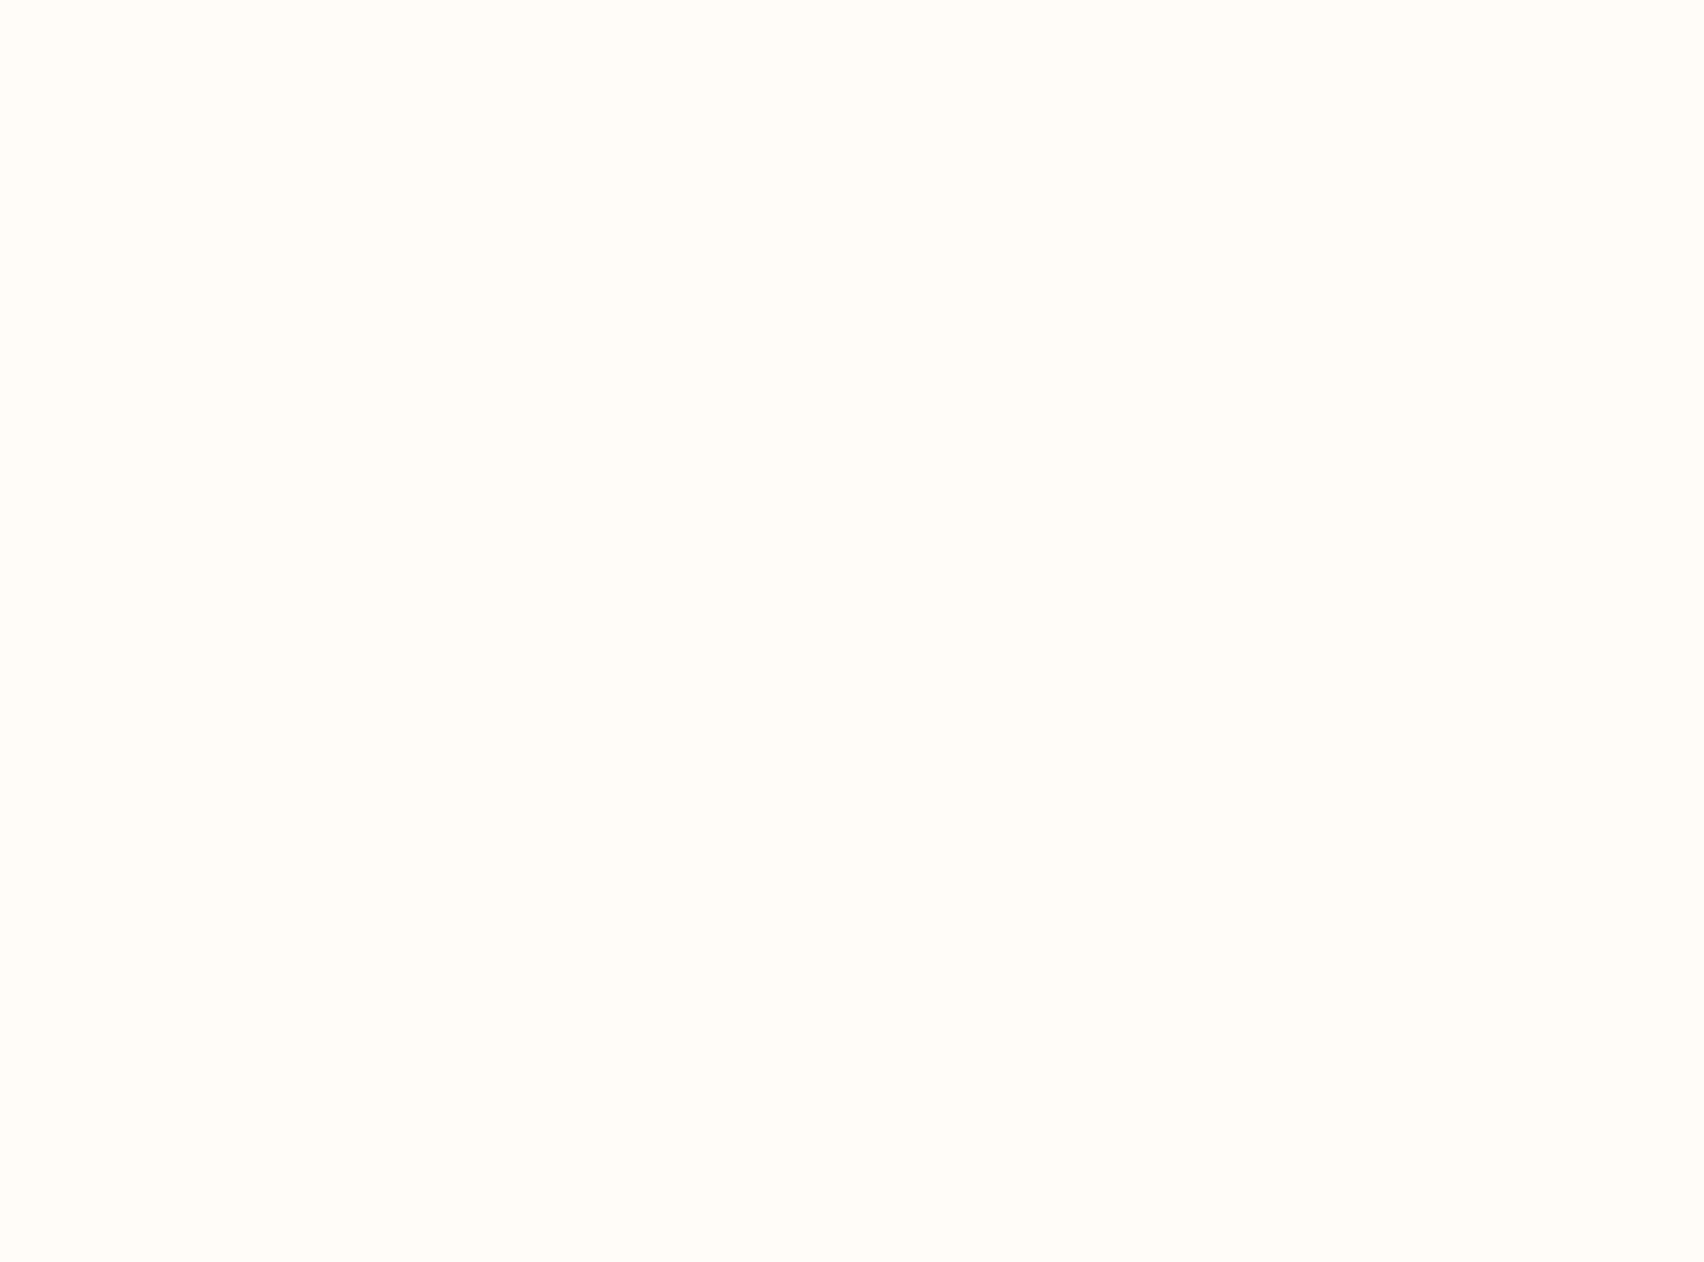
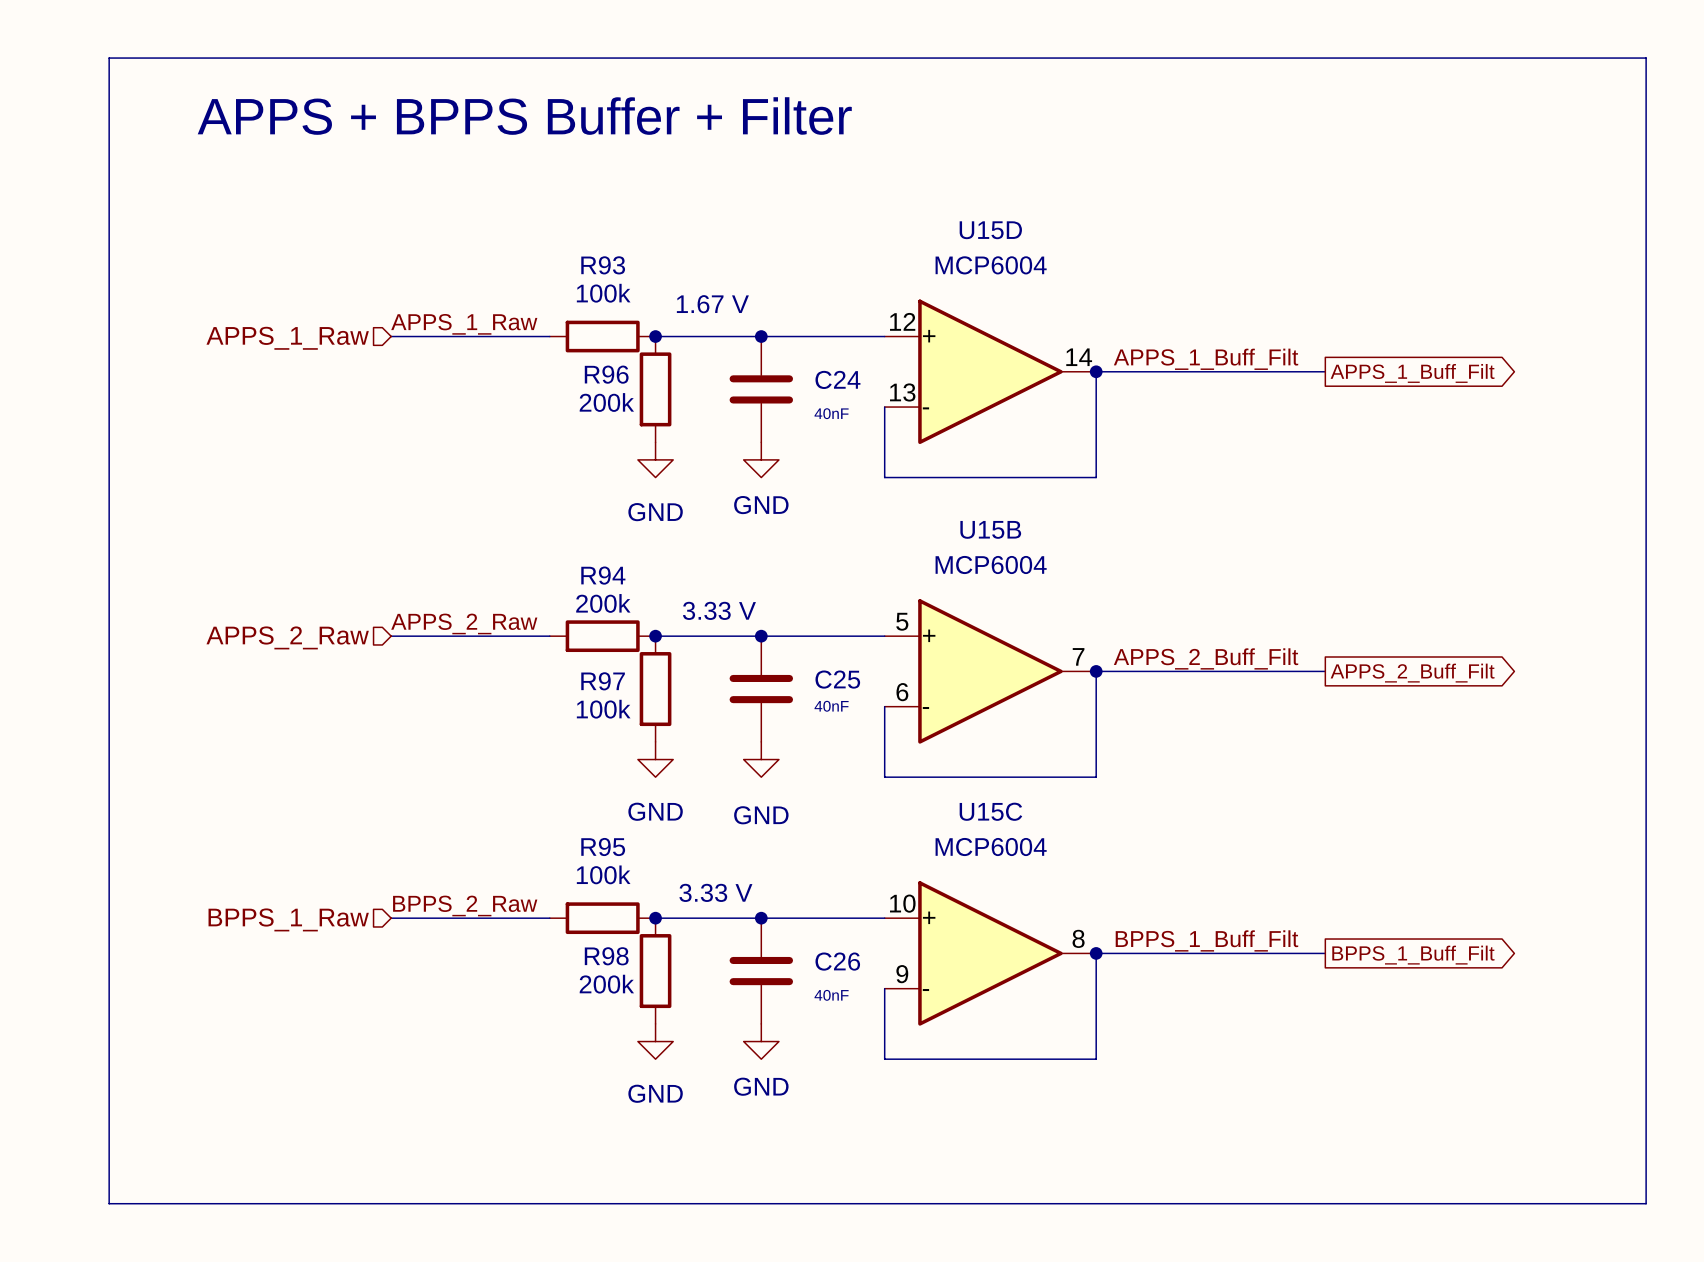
line: none -> (109, 58) (1646, 58) (1646, 1203) (109, 1203) (109, 58)
text: none -> APPS + BPPS Buffer + Filter (524, 116)
text: none -> 1.67 V (712, 304)
label: none -> APPS_1_Raw (464, 324)
wire: none -> (391, 336) (549, 336)
R93: none -> 100k (602, 336)
wire: none -> (655, 336) (884, 336)
junction: none -> (655, 336)
junction: none -> (761, 336)
hierarchical label: none -> APPS_1_Raw (287, 338)
label: none -> APPS_1_Buff_Filt (1206, 359)
U15D: none -> MCP6004 (990, 371)
junction: none -> (1096, 371)
wire: none -> (1325, 371) (1096, 371) (1096, 477) (884, 477) (884, 407)
global label: none -> APPS_1_Buff_Filt (1412, 373)
R96: none -> 200k (655, 389)
C24: none -> 40nF (761, 389)
power symbol: none -> GND (655, 459)
power symbol: none -> GND (761, 459)
text: none -> 3.33 V (719, 610)
label: none -> APPS_2_Raw (464, 623)
wire: none -> (391, 636) (549, 636)
R94: none -> 200k (602, 636)
wire: none -> (655, 636) (884, 636)
junction: none -> (655, 636)
junction: none -> (761, 636)
hierarchical label: none -> APPS_2_Raw (287, 637)
label: none -> APPS_2_Buff_Filt (1206, 658)
U15B: none -> MCP6004 (990, 671)
junction: none -> (1096, 671)
wire: none -> (1325, 671) (1096, 671) (1096, 777) (884, 777) (884, 706)
global label: none -> APPS_2_Buff_Filt (1412, 673)
R97: none -> 100k (655, 689)
C25: none -> 40nF (761, 689)
power symbol: none -> GND (655, 759)
power symbol: none -> GND (761, 759)
text: none -> 3.33 V (715, 892)
label: none -> BPPS_2_Raw (465, 905)
wire: none -> (391, 918) (549, 918)
R95: none -> 100k (602, 918)
wire: none -> (655, 918) (884, 918)
junction: none -> (655, 918)
junction: none -> (761, 918)
hierarchical label: none -> BPPS_1_Raw (288, 919)
label: none -> BPPS_1_Buff_Filt (1206, 940)
U15C: none -> MCP6004 (990, 953)
junction: none -> (1096, 953)
wire: none -> (1325, 953) (1096, 953) (1096, 1059) (884, 1059) (884, 988)
global label: none -> BPPS_1_Buff_Filt (1413, 955)
R98: none -> 200k (655, 971)
C26: none -> 40nF (761, 971)
power symbol: none -> GND (655, 1041)
power symbol: none -> GND (761, 1041)

